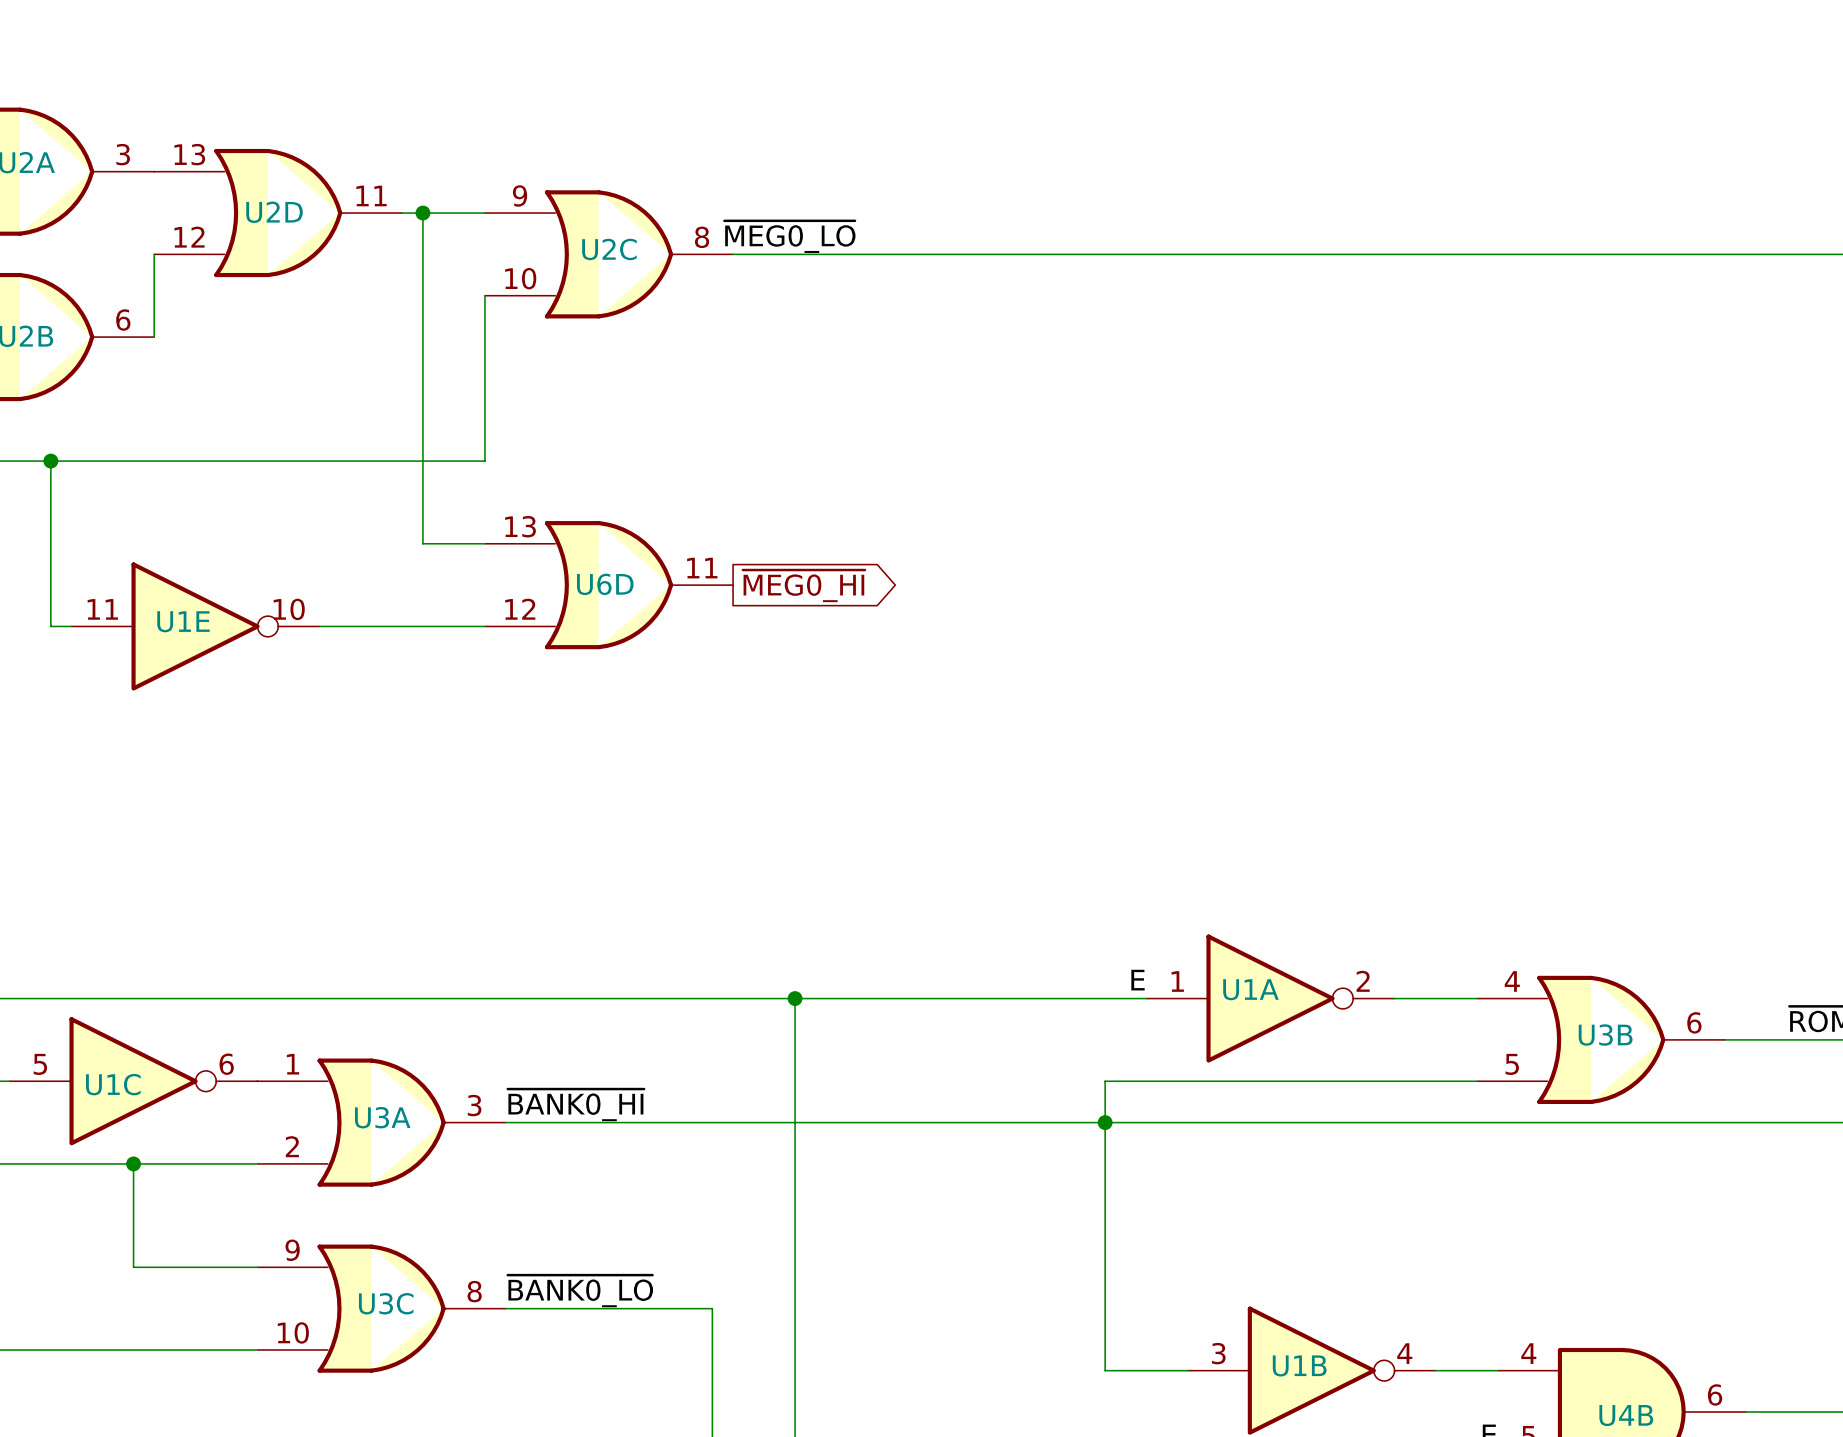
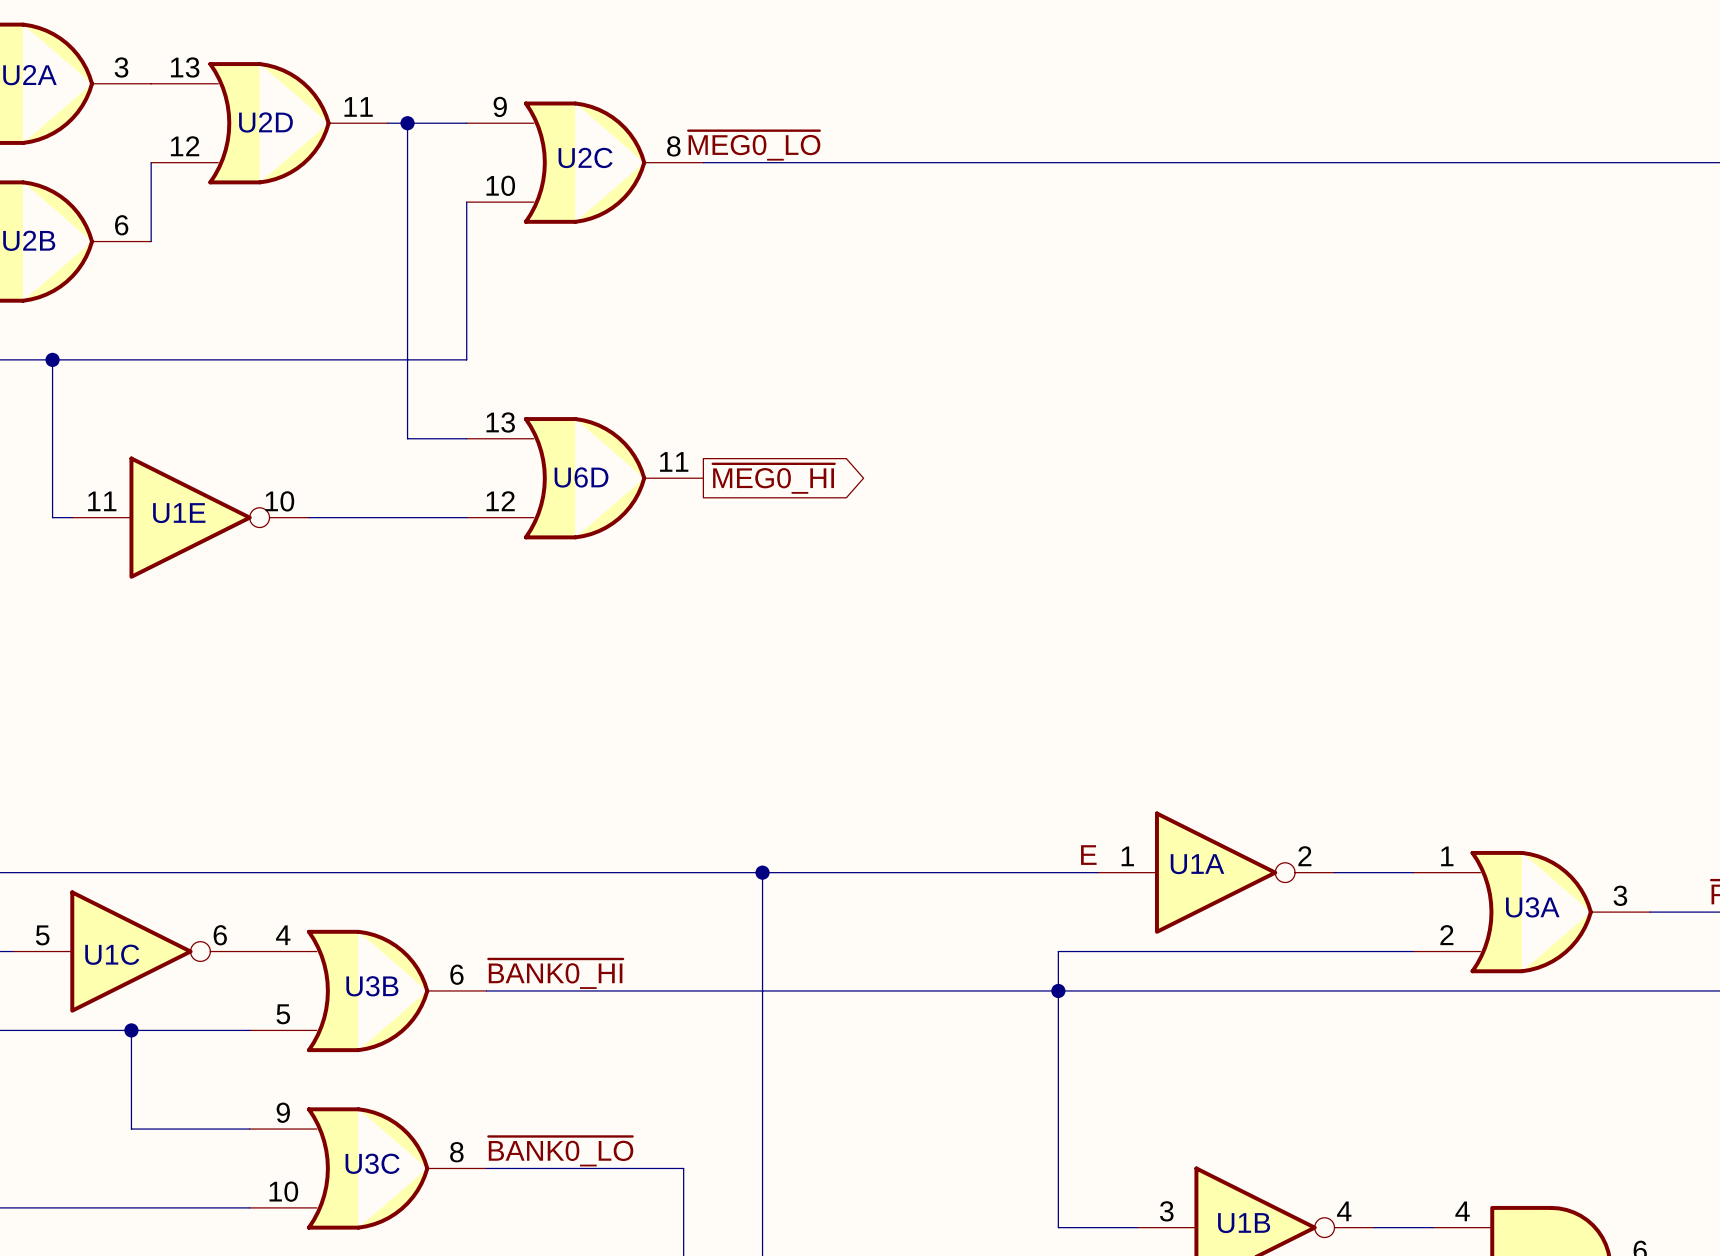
U3B position: (1601, 1039) -> (368, 990)
U3A position: (381, 1122) -> (1531, 912)

